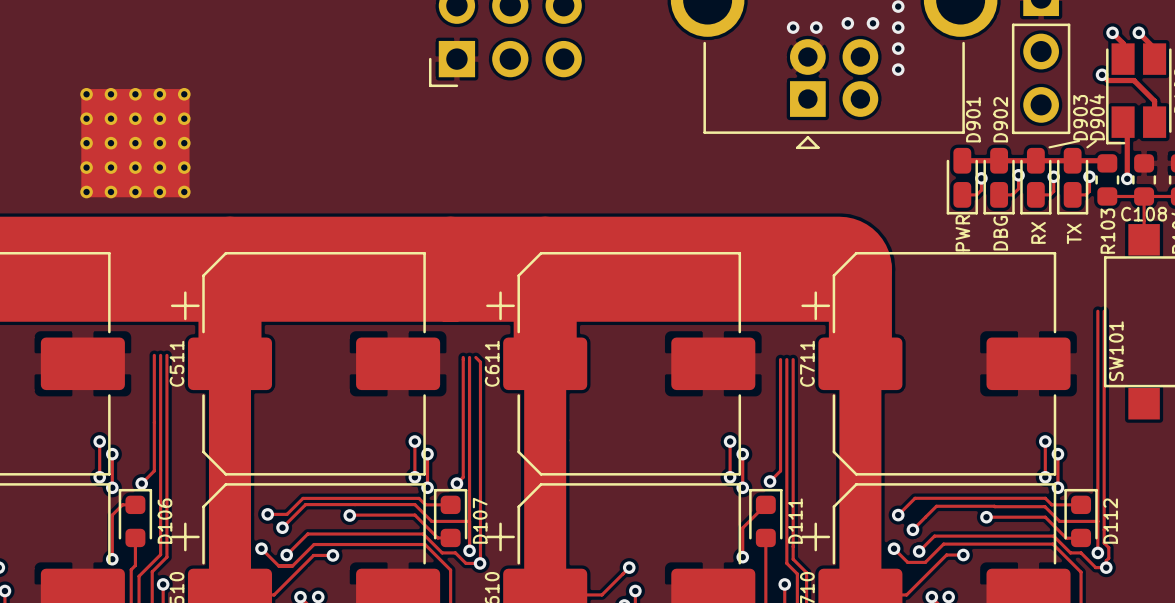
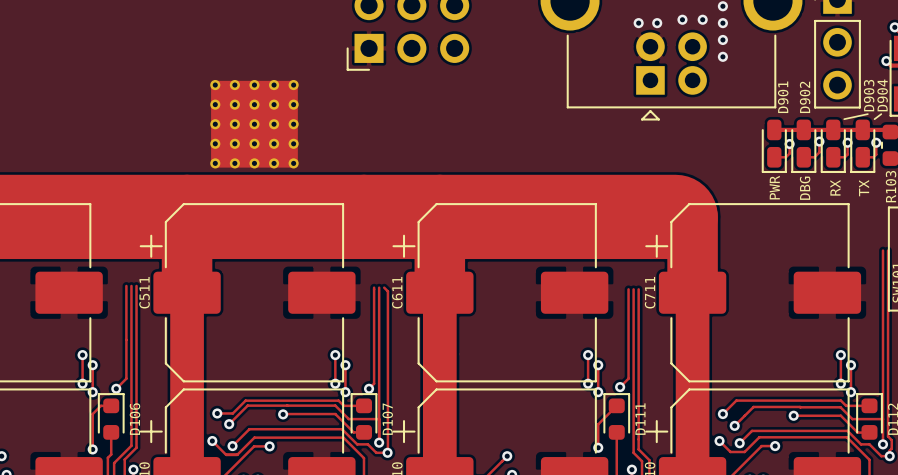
part position: (135, 143) -> (254, 124)

